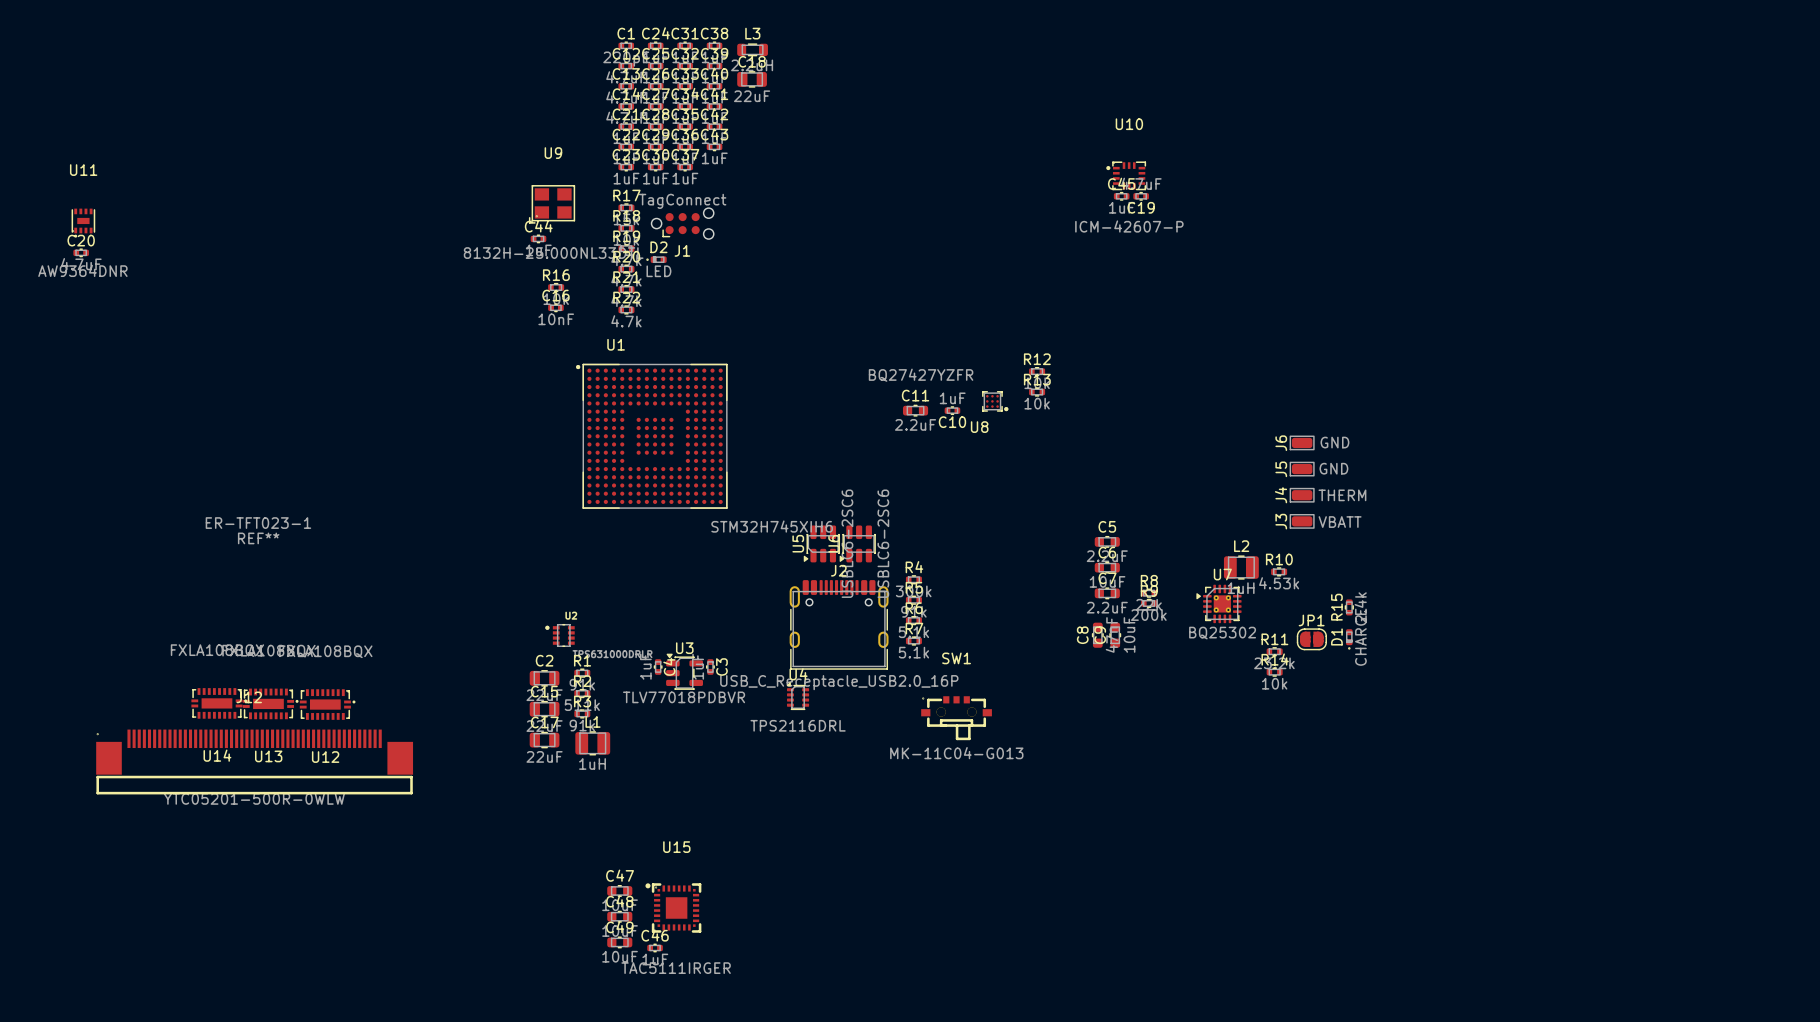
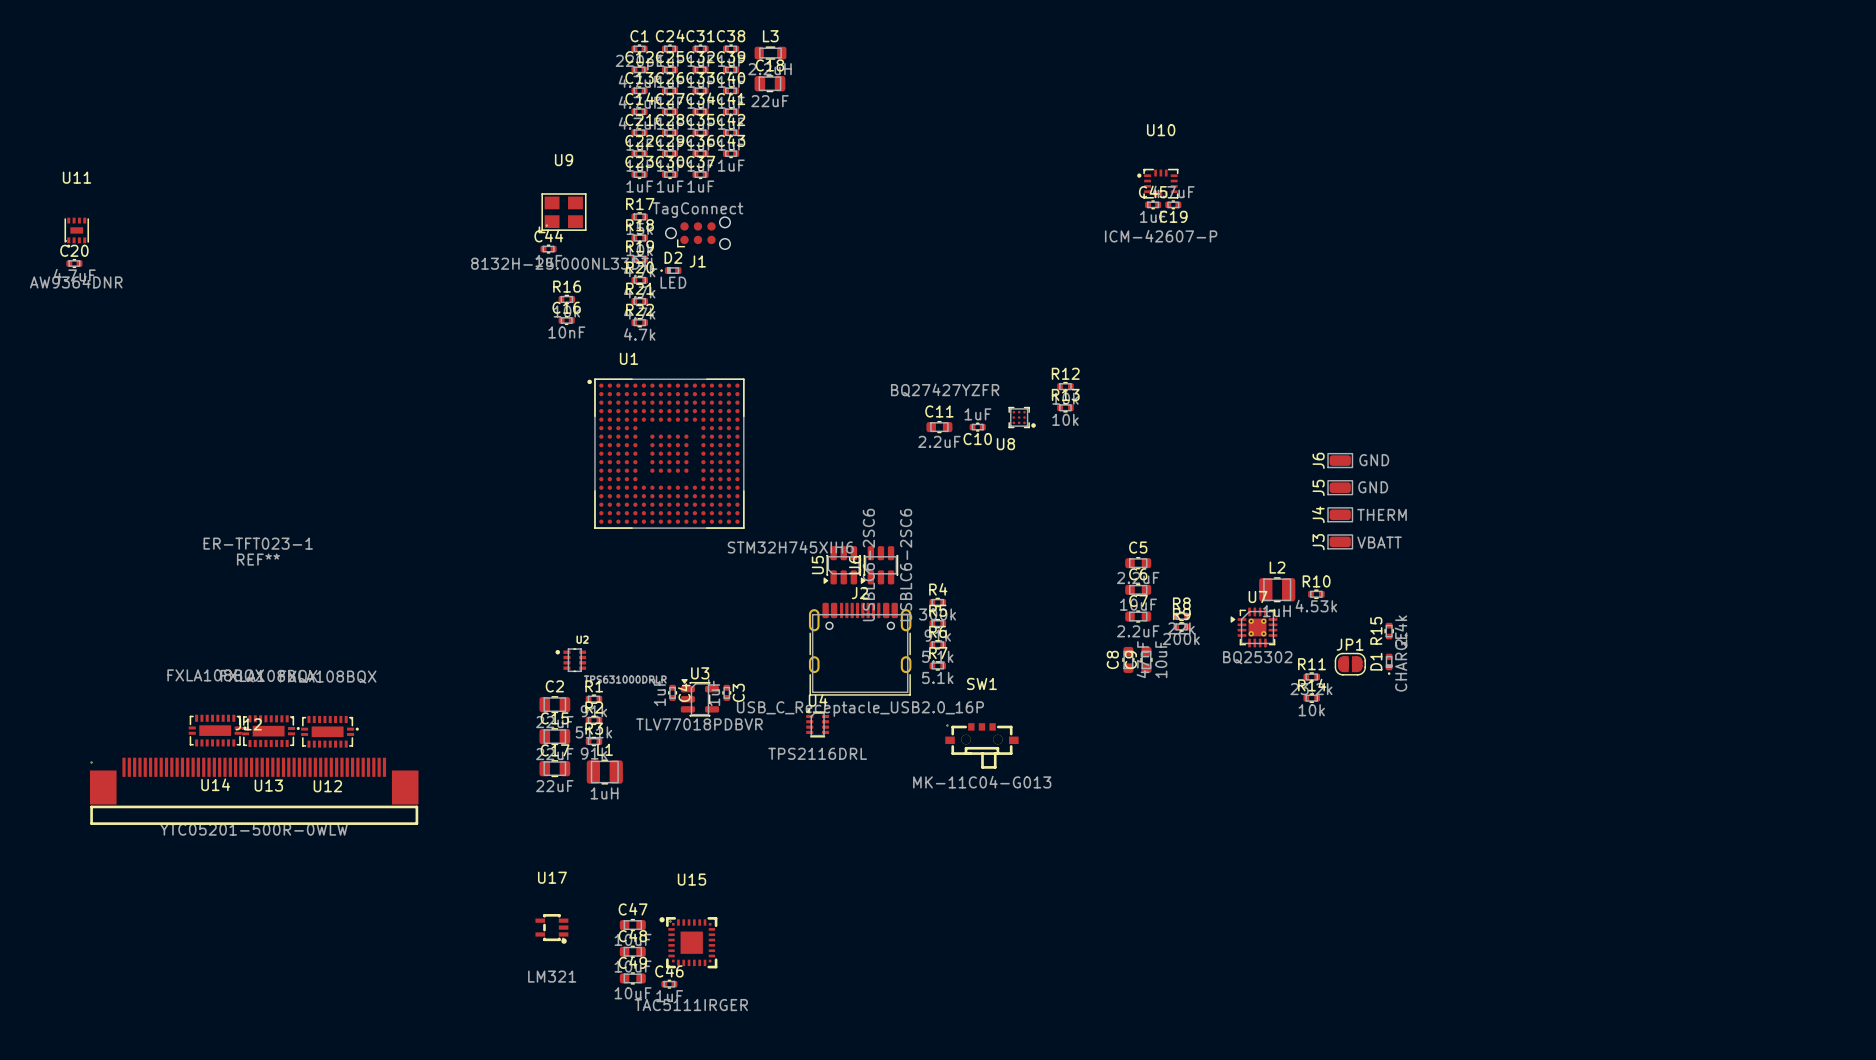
U17: none -> LM321 (551, 928)

